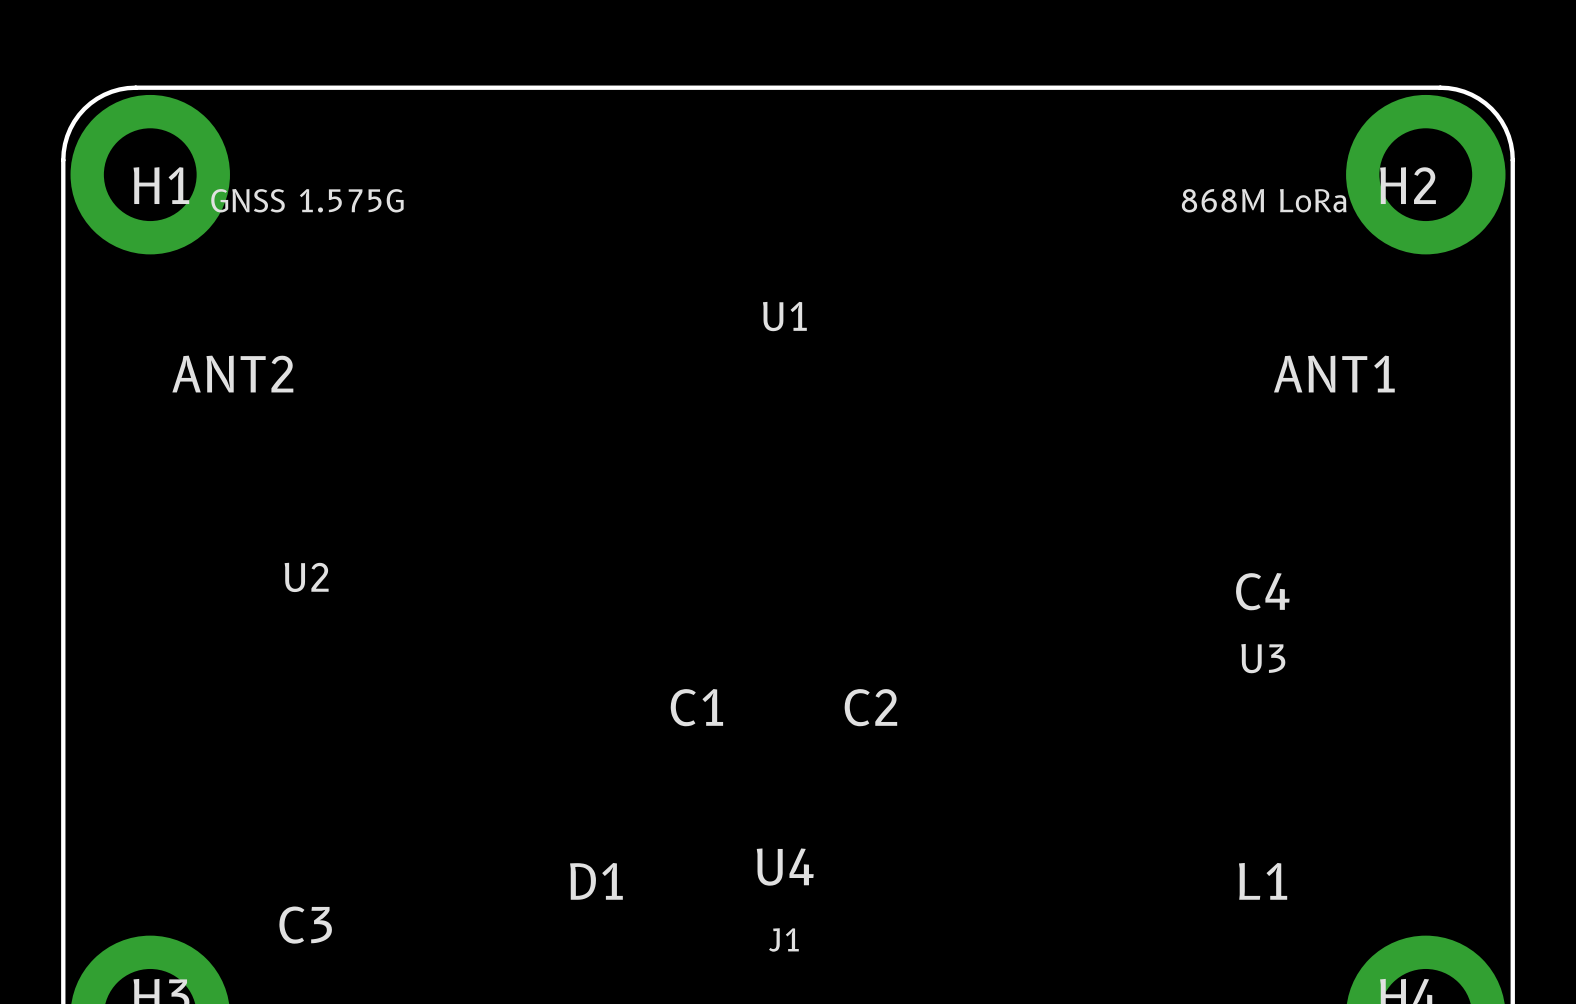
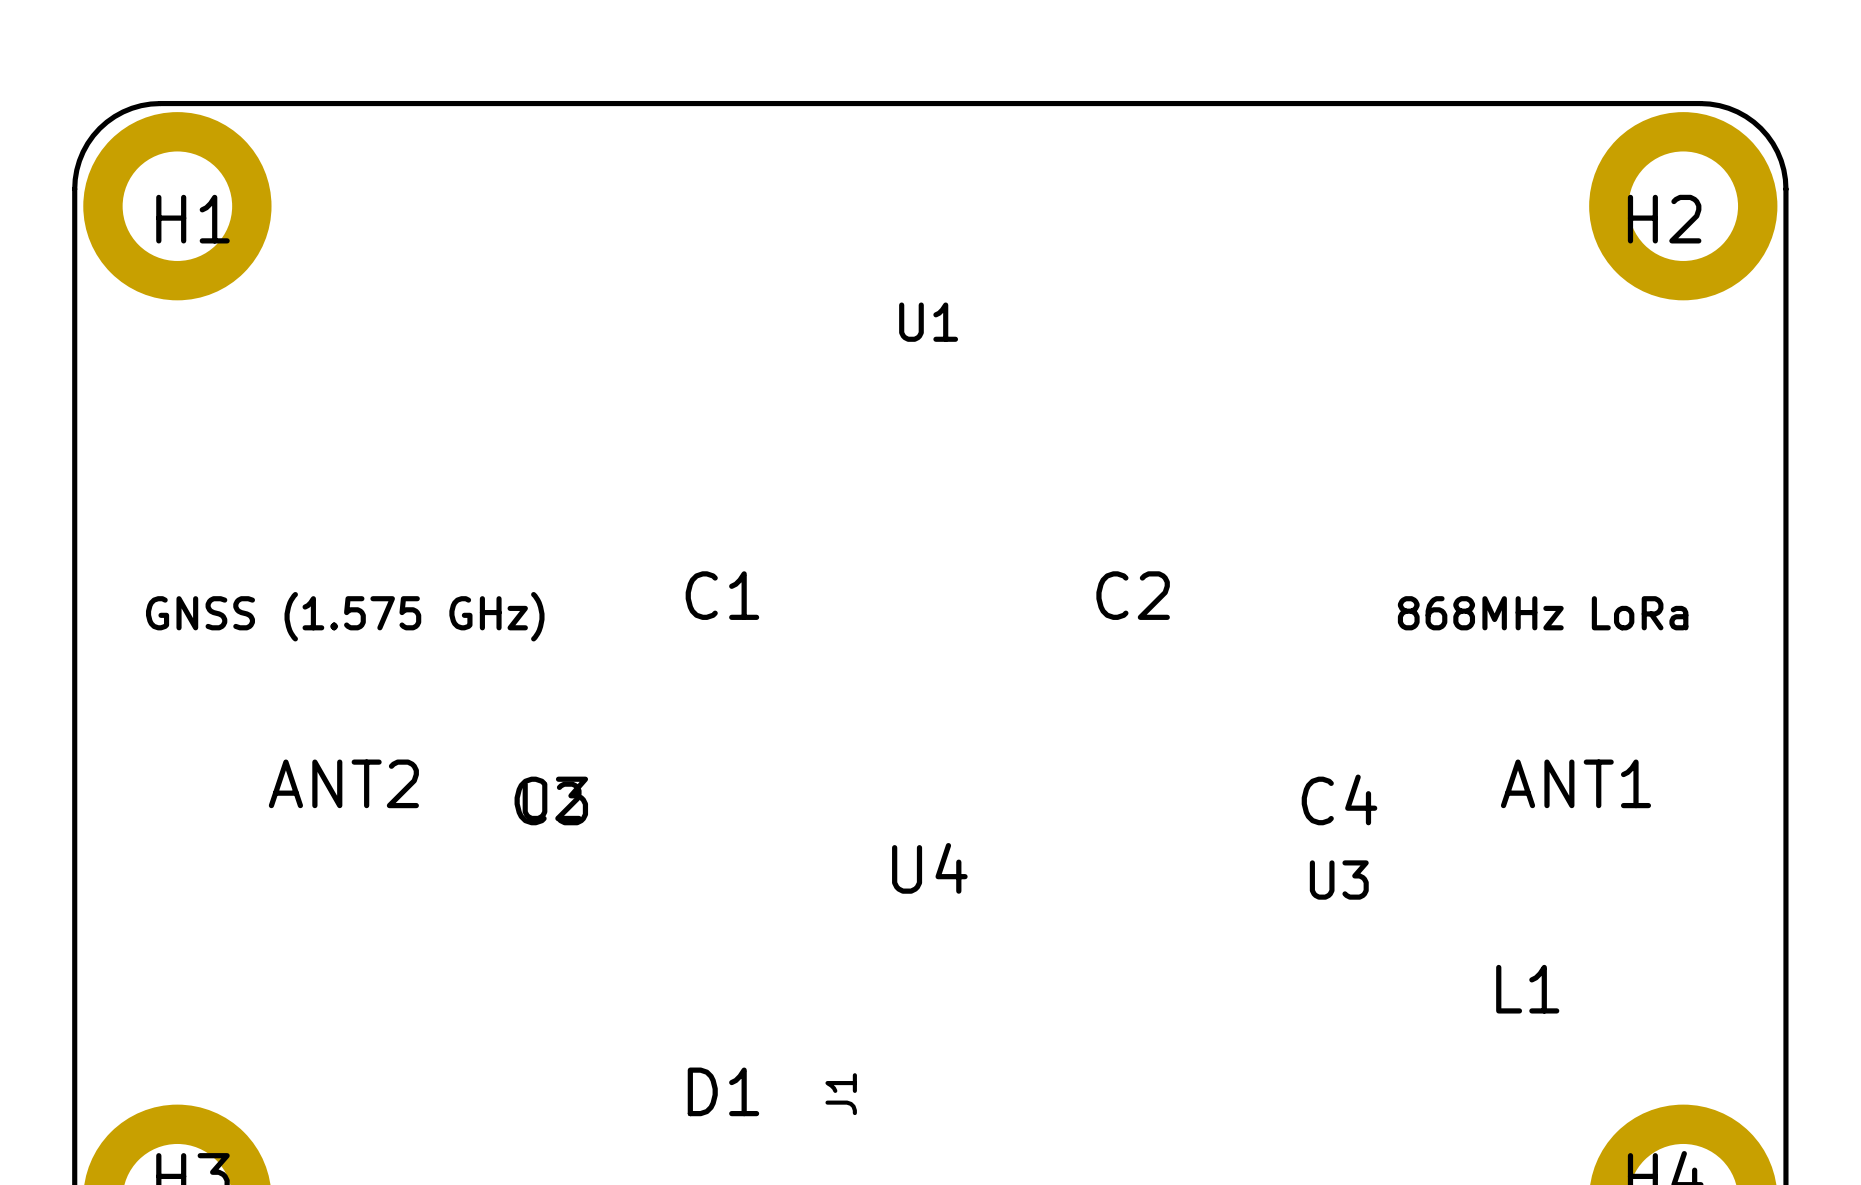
text: GNSS 1.575G (307, 200) -> none
text: 868M LoRa (1264, 200) -> none
U1 position: (784, 316) -> (928, 322)
ANT2 position: (232, 374) -> (343, 783)
ANT1 position: (1334, 374) -> (1575, 783)
text: none -> 868MHz LoRa (1543, 613)
text: none -> GNSS (1.575 GHz) (345, 616)
U2 position: (306, 577) -> (552, 801)
C4 position: (1262, 591) -> (1339, 799)
U3 position: (1263, 658) -> (1339, 880)
C1 position: (696, 707) -> (722, 595)
C2 position: (870, 707) -> (1133, 595)
U4 position: (785, 867) -> (929, 868)
D1 position: (596, 881) -> (723, 1091)
L1 position: (1263, 881) -> (1527, 989)
C3 position: (305, 925) -> (551, 800)
J1 position: (783, 939) -> (841, 1094)
J1 name rotation: 0° (783, 939) -> 90° counterclockwise (841, 1094)

